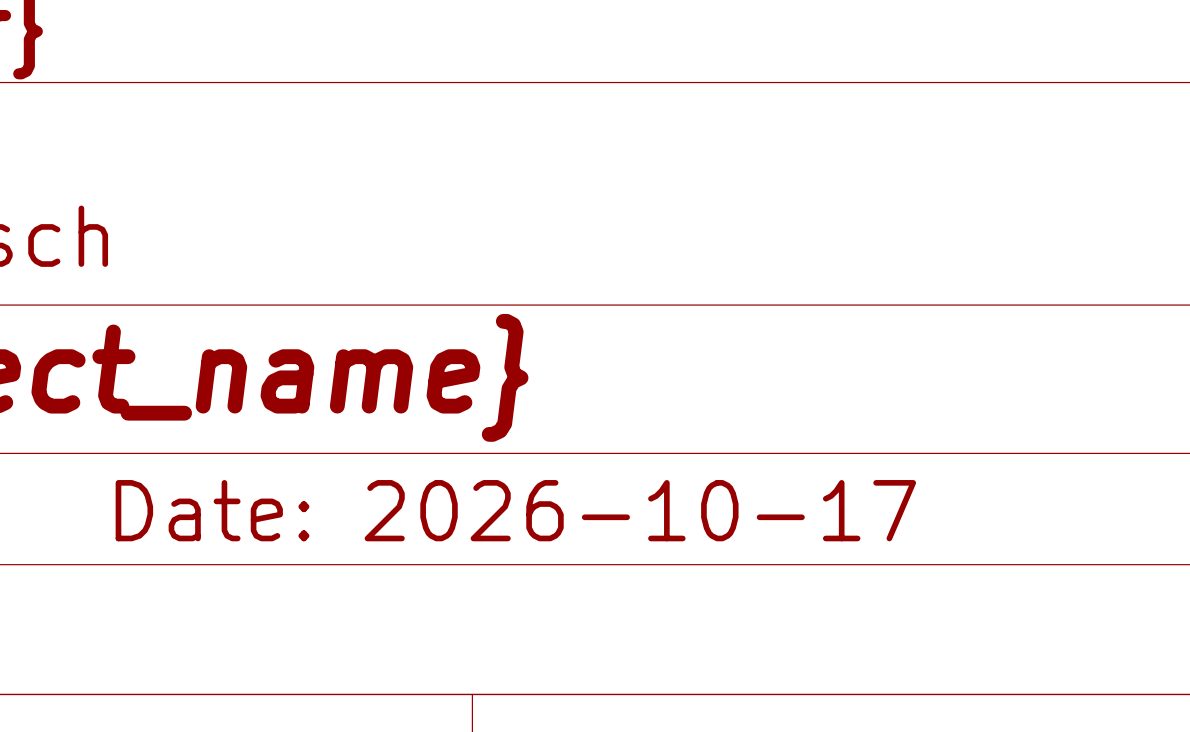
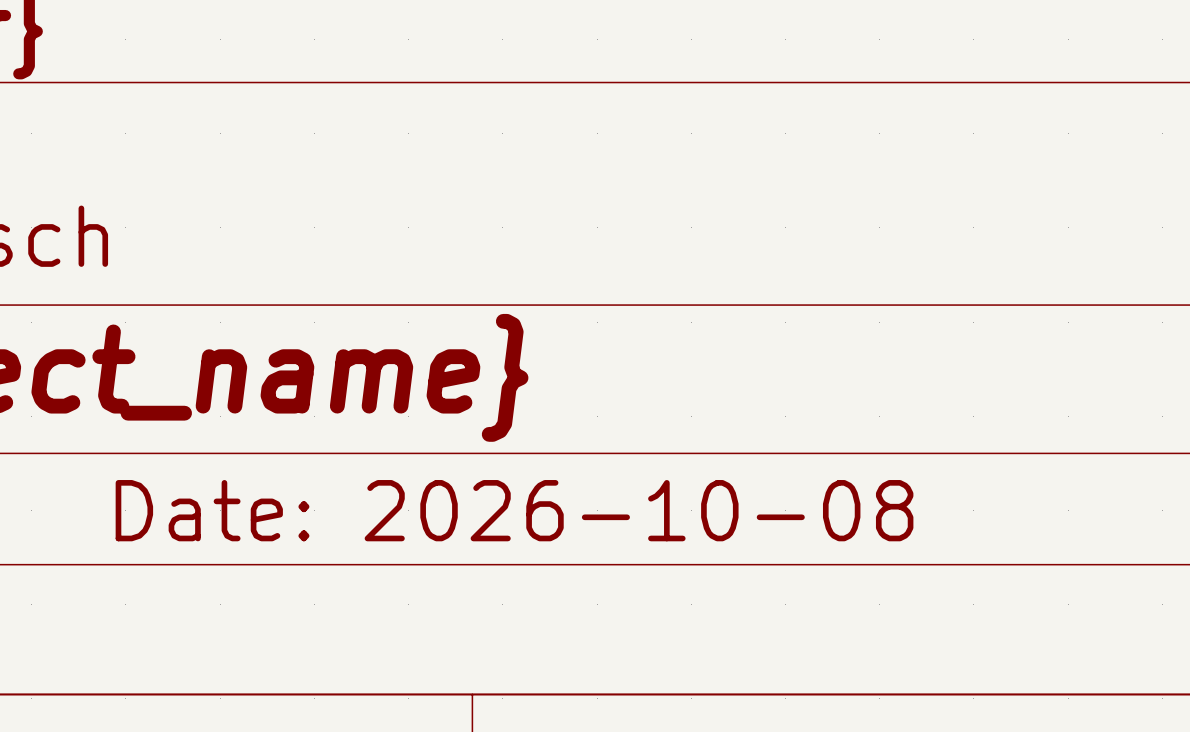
title block: Date: 2026-10-17 (515, 510) -> Date: 2026-10-08 (514, 510)

